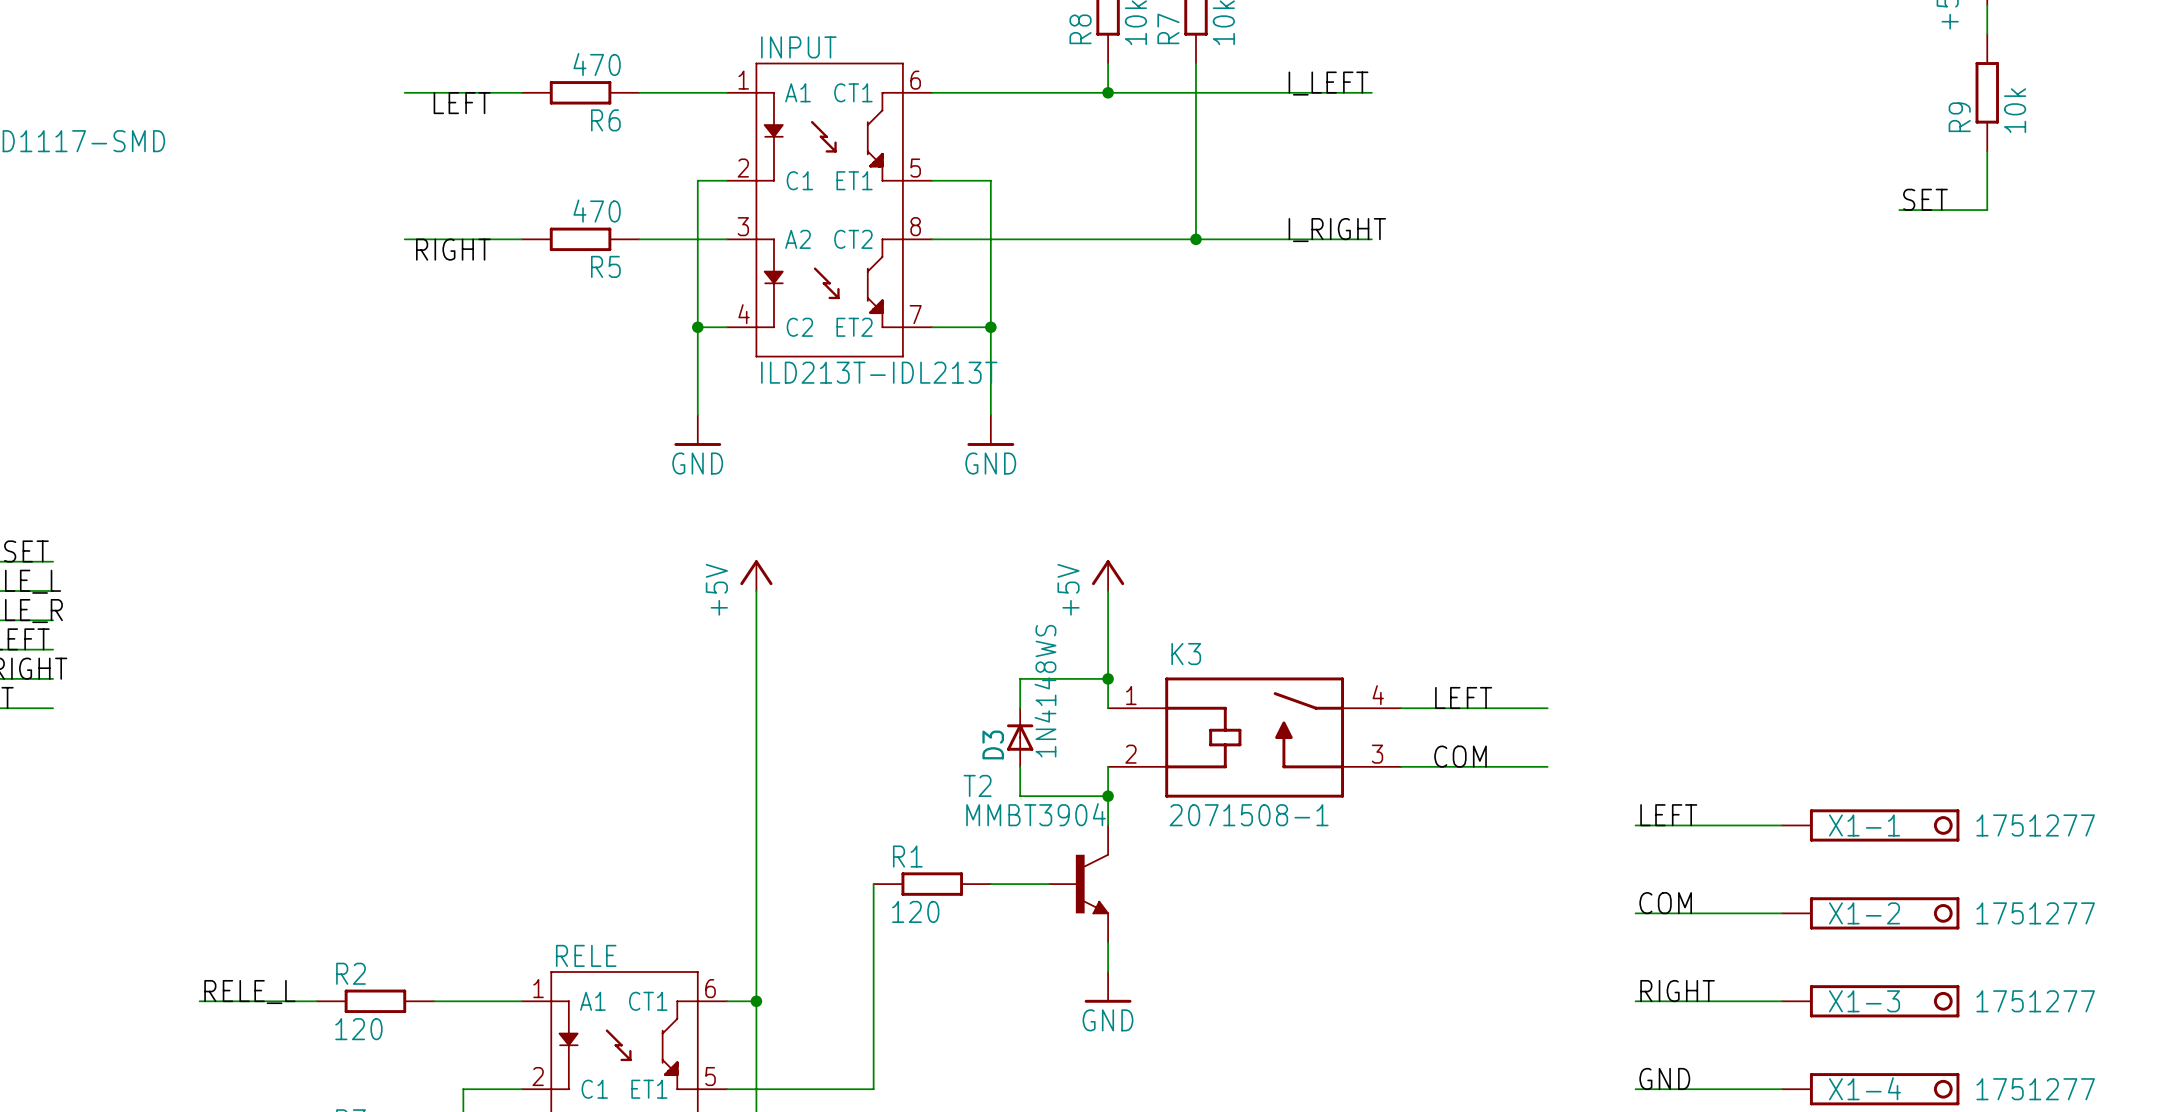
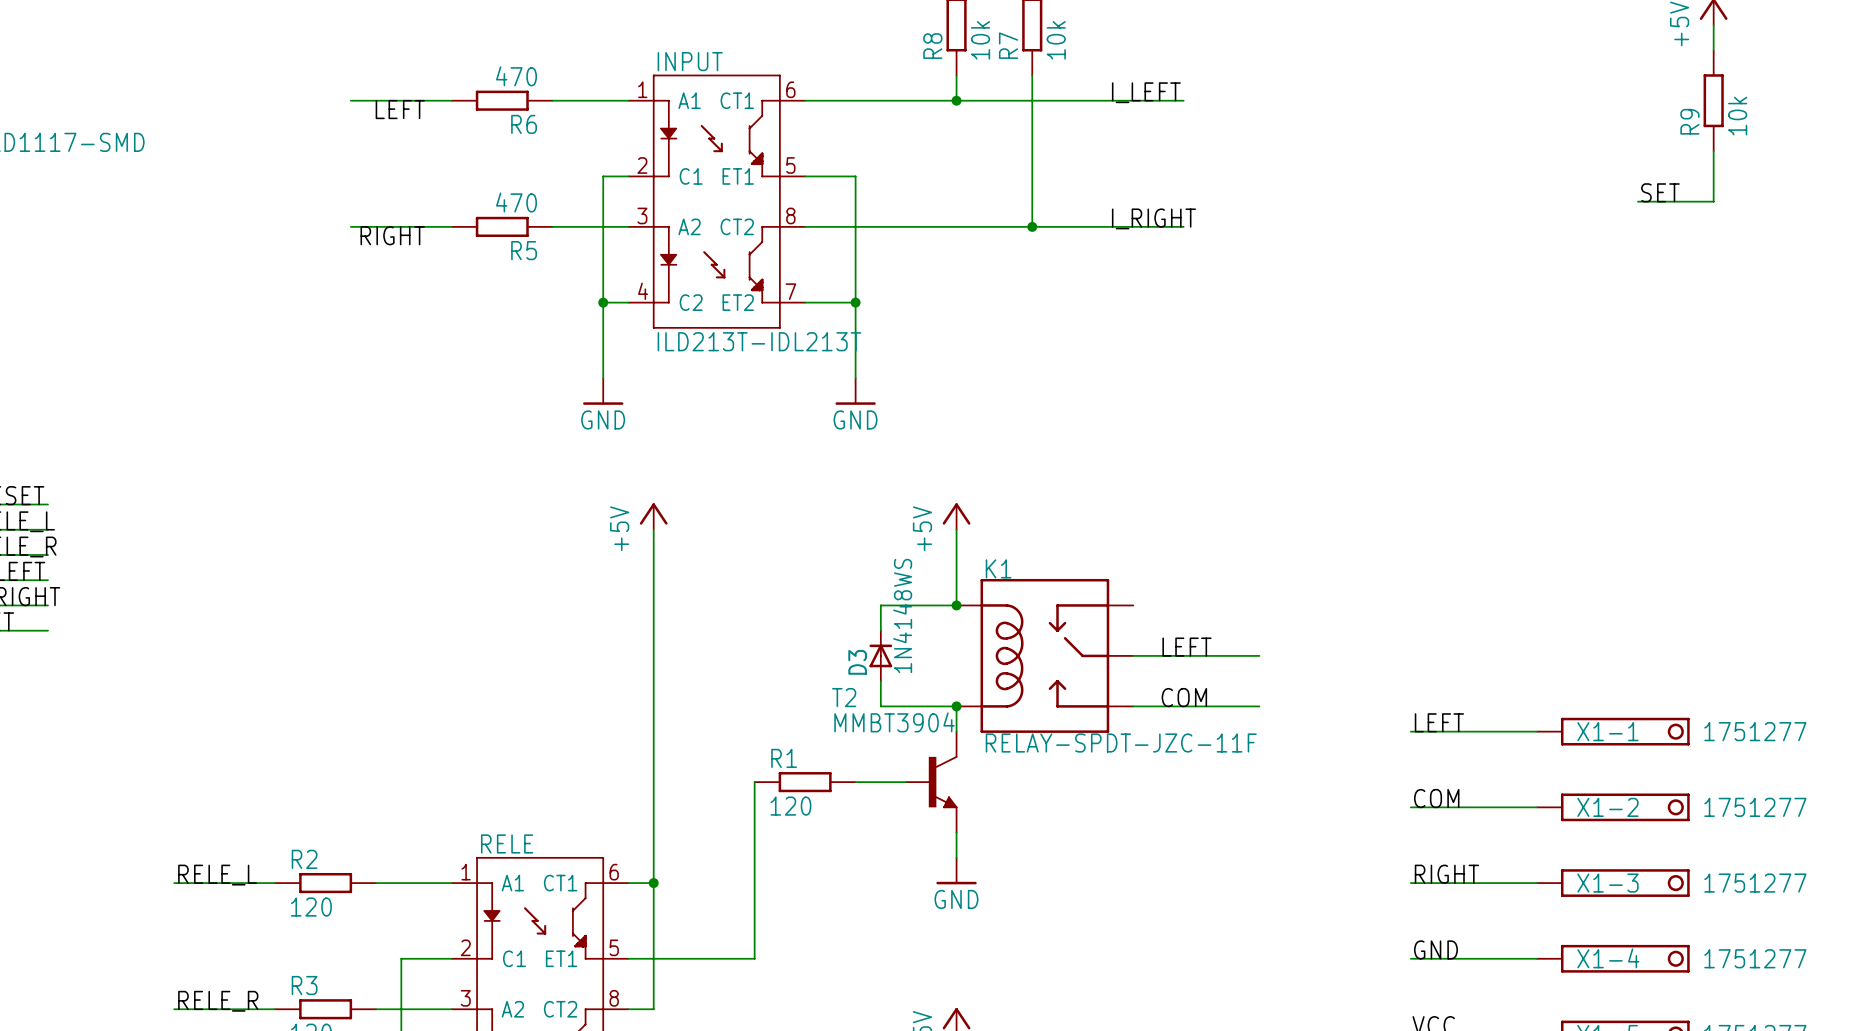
wire: (1108, 678) (1108, 708) -> none
label position: LEFT (1463, 697) -> LEFT (1187, 647)
wire: (1401, 708) (1547, 708) -> (1133, 706) (1259, 706)
K1: none -> RELAY-SPDT-JZC-11F (1044, 655)
K3: 2071508-1 (1254, 737) -> none
label position: COM (1460, 756) -> COM (1184, 697)
wire: (1108, 766) (1108, 796) -> none
wire: (1401, 766) (1547, 766) -> (1133, 655) (1259, 655)

